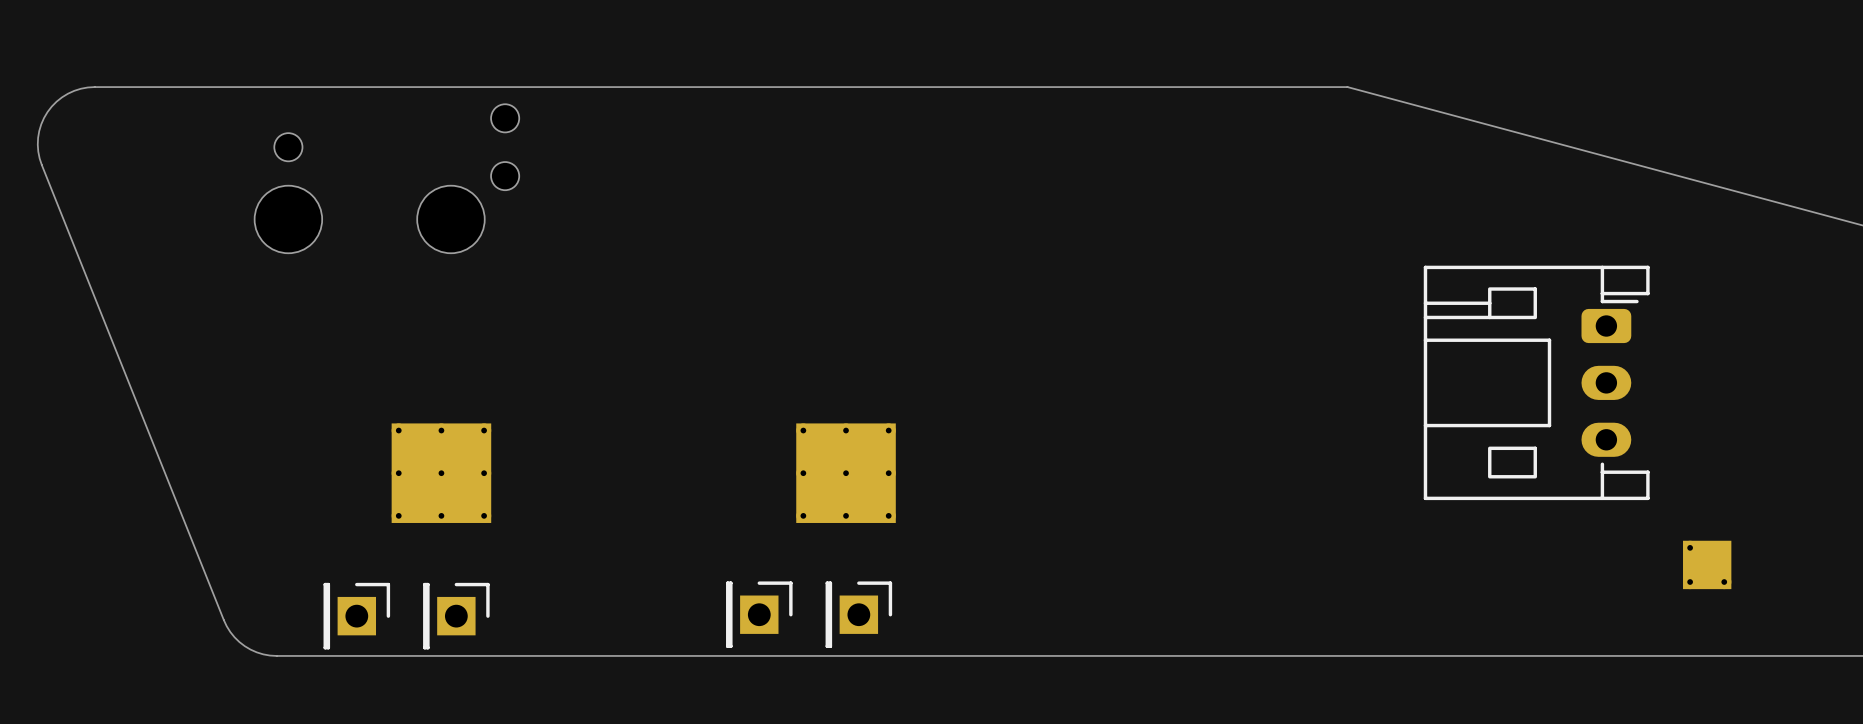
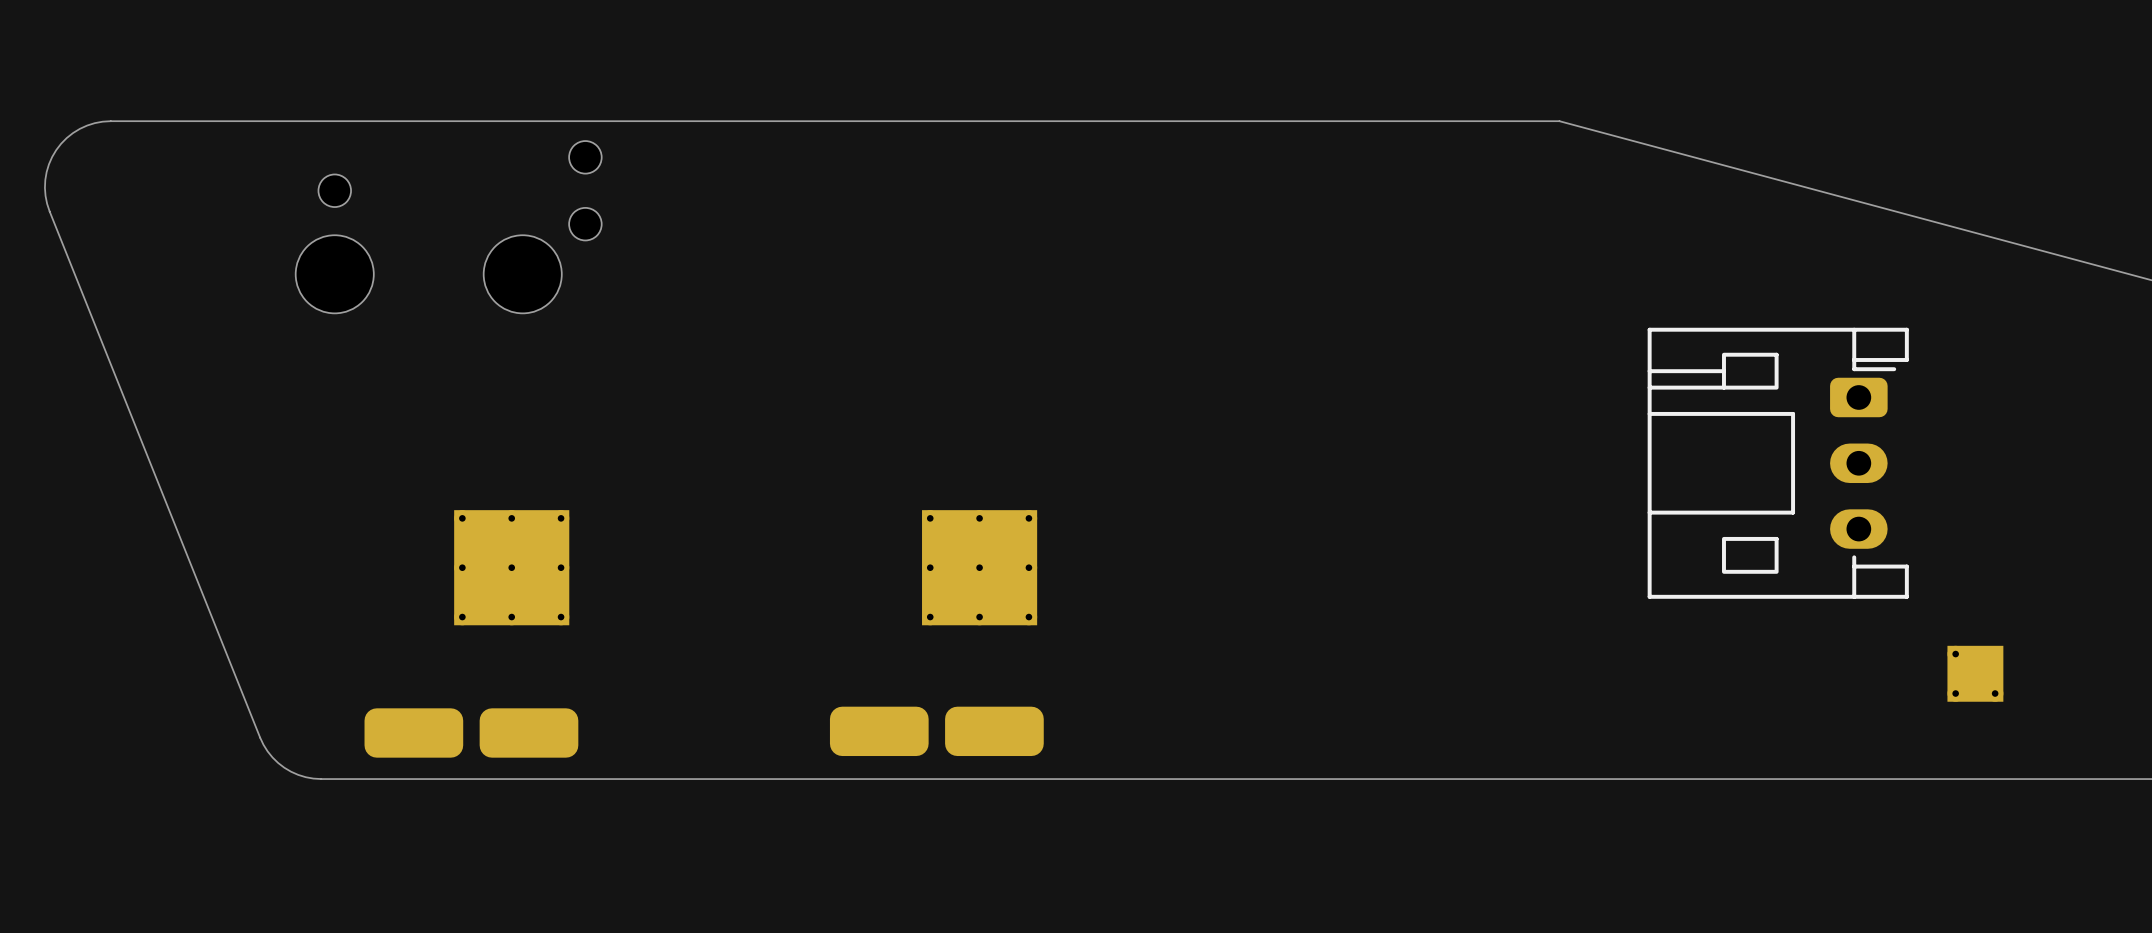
part footprint: [726, 581, 793, 648] -> [829, 706, 929, 757]
part footprint: [825, 581, 893, 648] -> [945, 706, 1044, 757]
part footprint: [323, 582, 391, 650] -> [364, 708, 464, 758]
part footprint: [423, 582, 490, 650] -> [479, 708, 579, 758]

